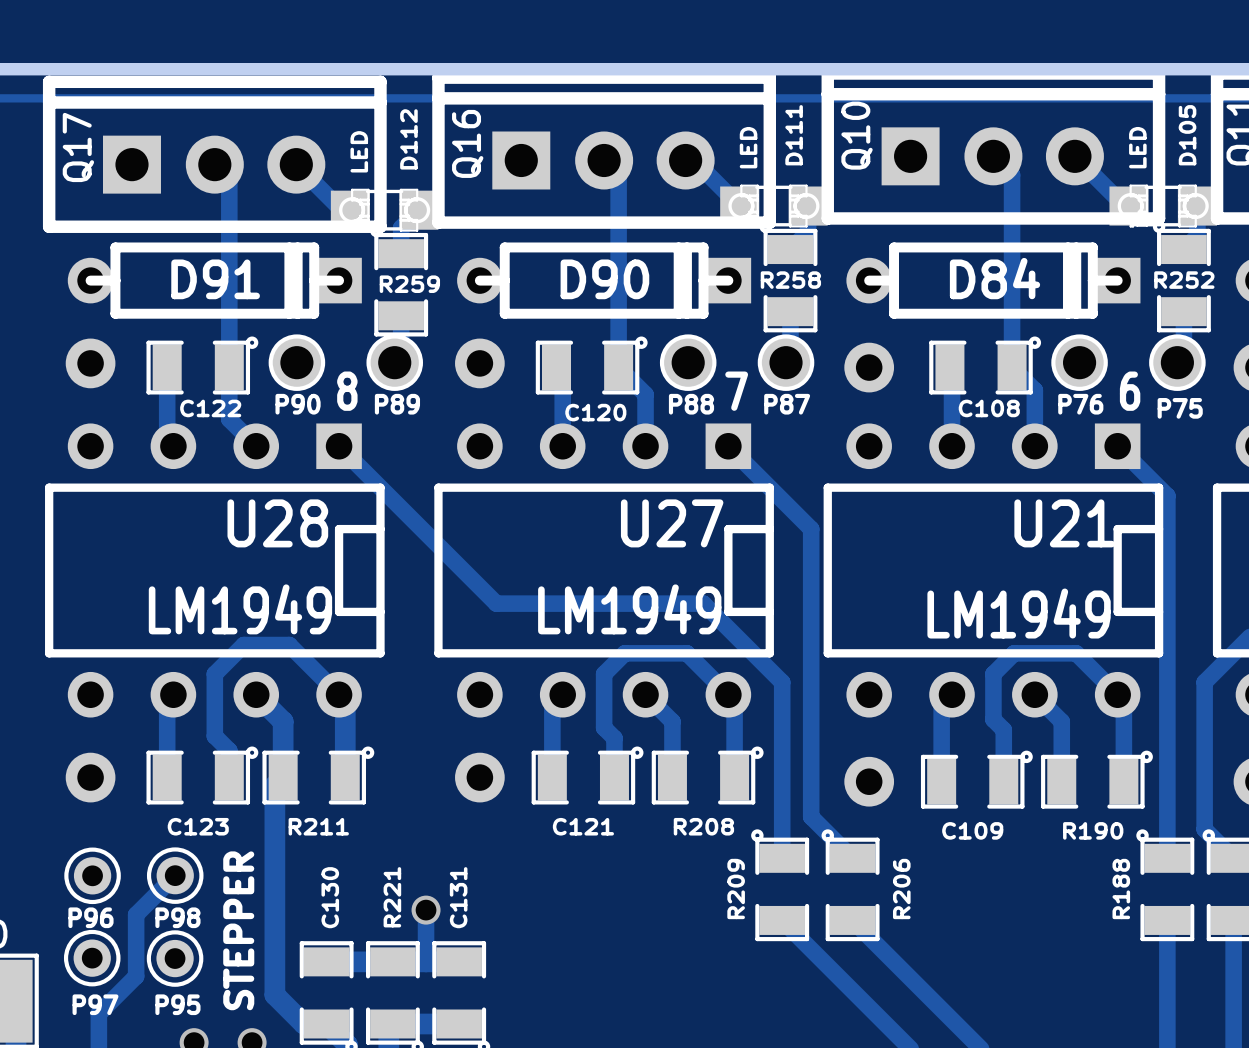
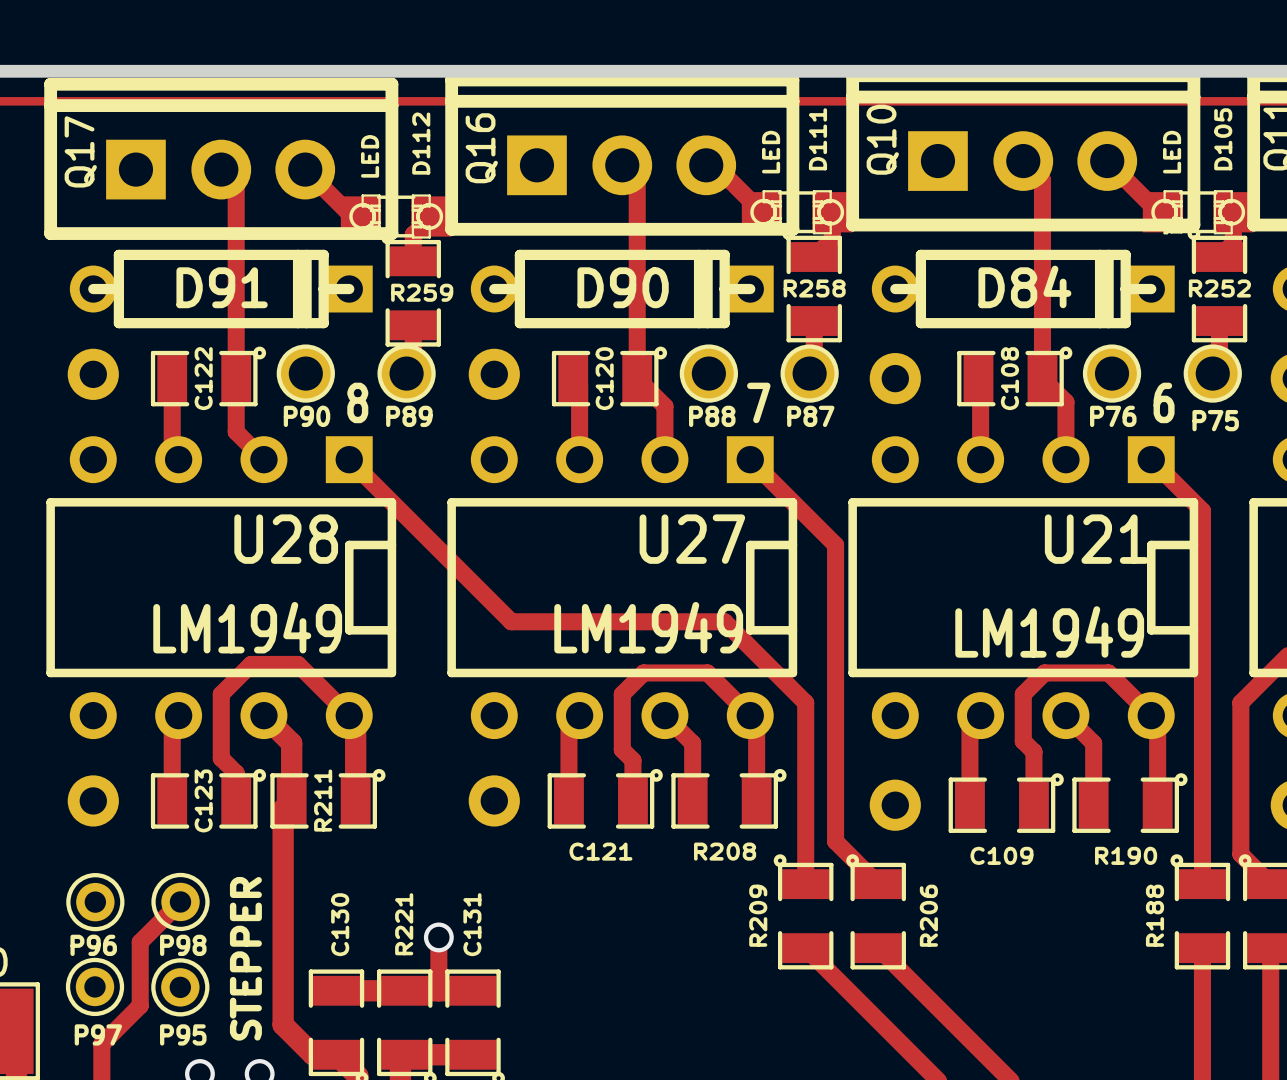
C122 name rotation: 0° (210, 408) -> 90° counterclockwise (203, 378)
C108 name rotation: 0° (989, 408) -> 90° counterclockwise (1009, 378)
C120 name rotation: 0° (595, 412) -> 90° counterclockwise (604, 378)
C123 name rotation: 0° (198, 826) -> 90° counterclockwise (203, 800)
R211 name rotation: 0° (318, 826) -> 90° counterclockwise (323, 800)

